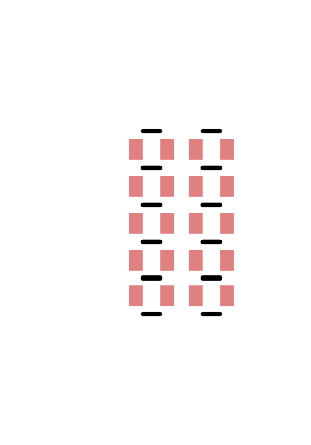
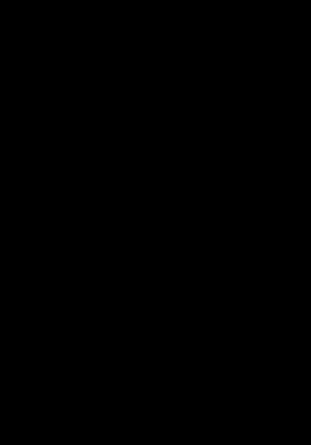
part: (151, 149) -> none
part: (211, 149) -> none
part: (151, 186) -> none
part: (211, 186) -> none
part: (151, 223) -> none
part: (211, 223) -> none
part: (151, 260) -> none
part: (211, 260) -> none
part: (151, 295) -> none
part: (211, 295) -> none

